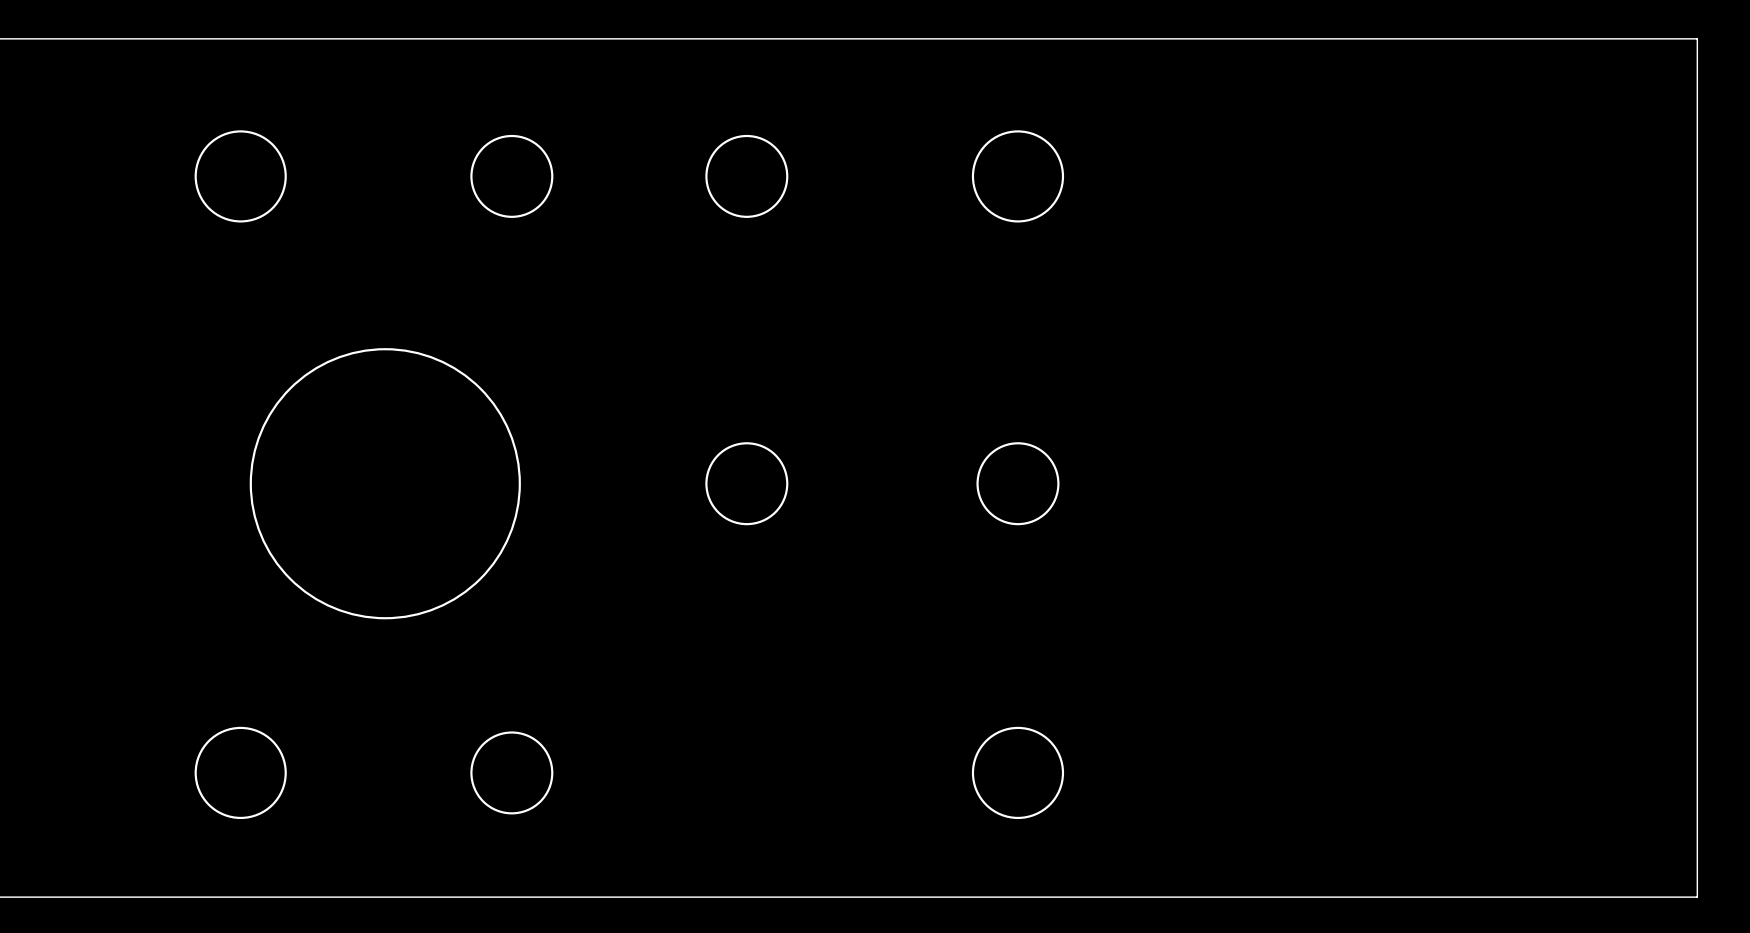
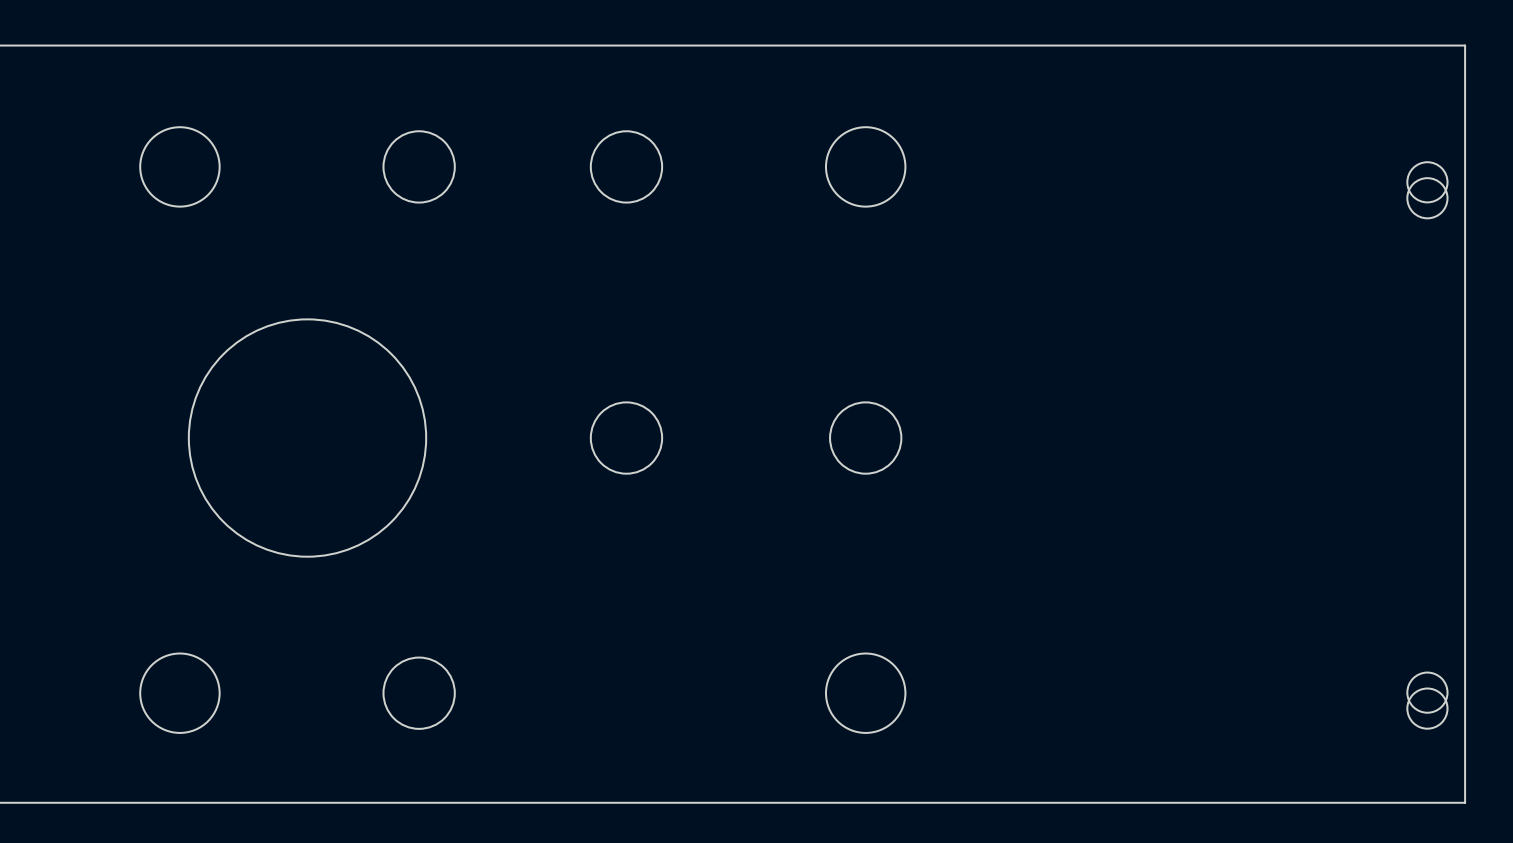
round board edge: none -> [1406, 161, 1449, 204]
round board edge: none -> [1406, 177, 1449, 220]
round board edge: none -> [1406, 671, 1449, 714]
round board edge: none -> [1406, 687, 1449, 730]

